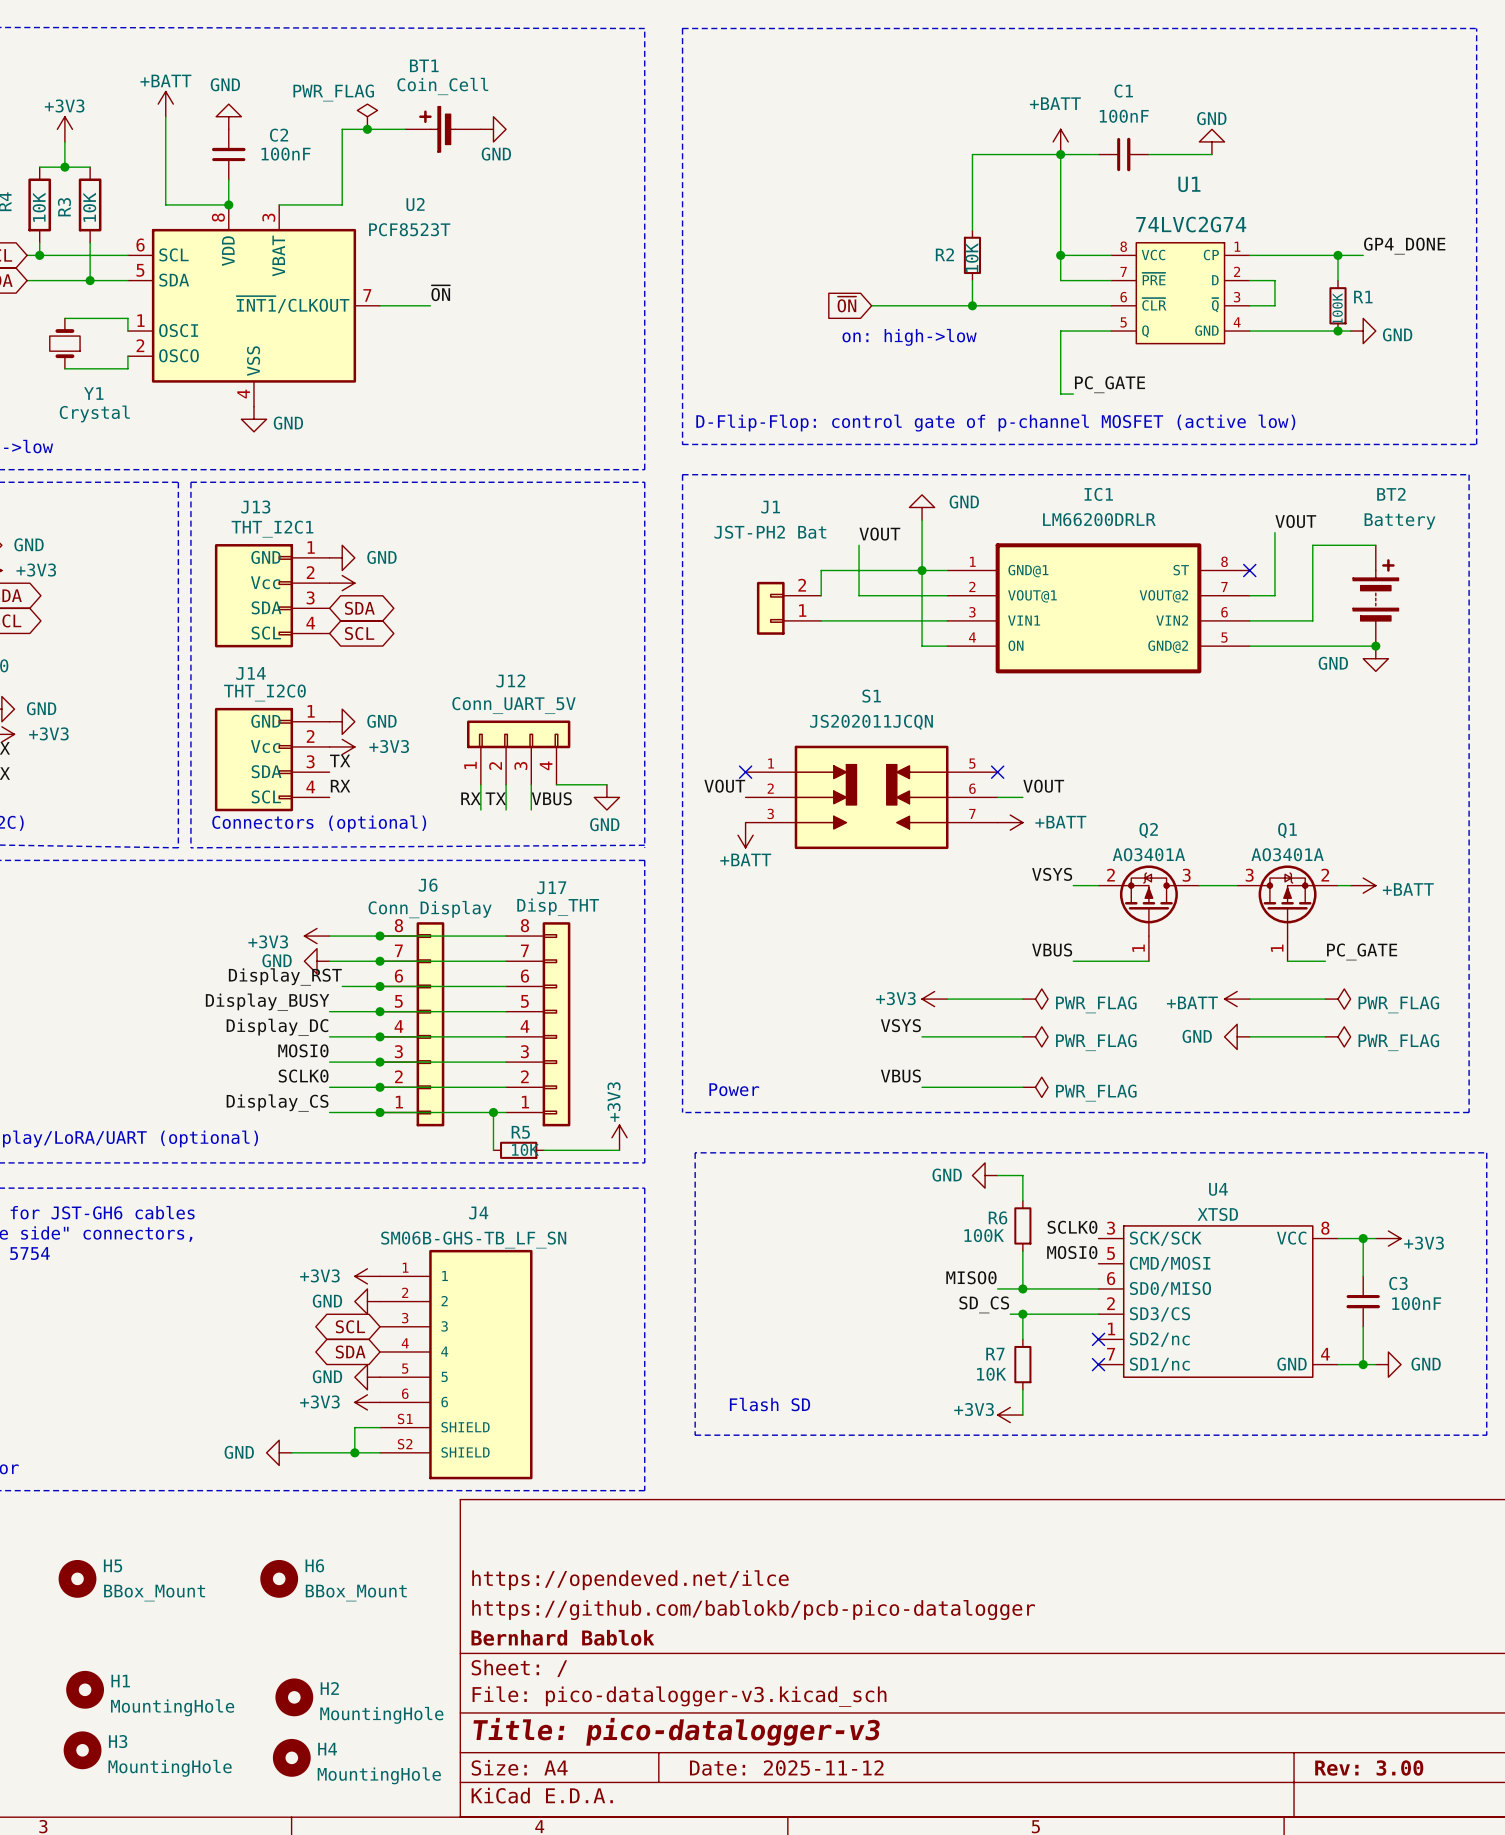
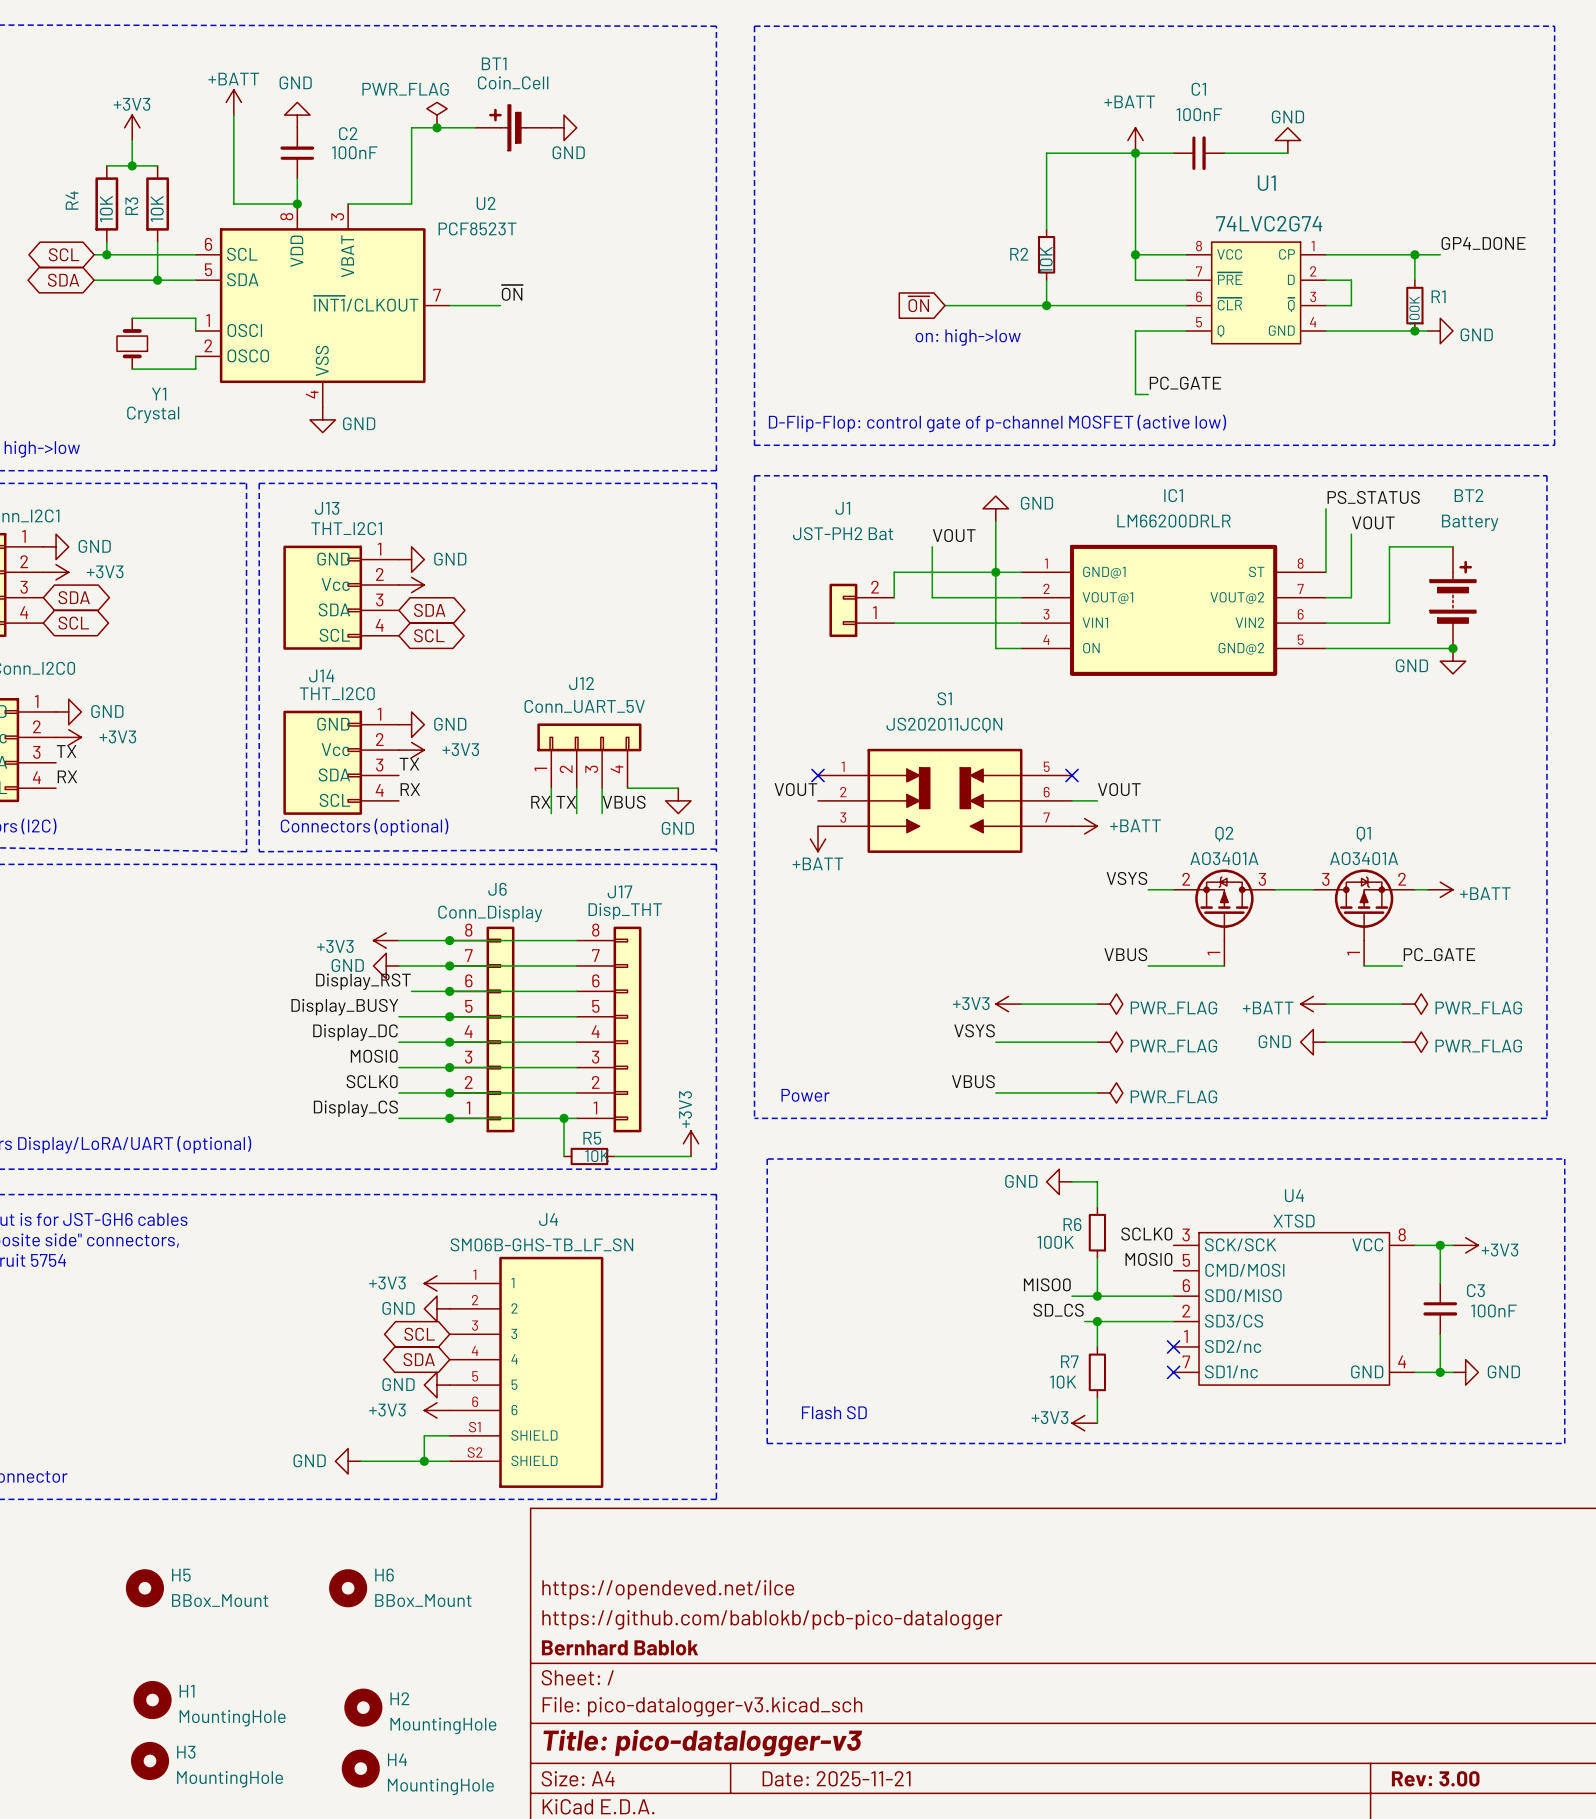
label: none -> PS_STATUS (1373, 497)
wire: none -> (1325, 508) (1325, 572)
no-connect mark: (1249, 570) -> none
title block: Date: 2025-11-12 (786, 1768) -> Date: 2025-11-21 (836, 1778)

